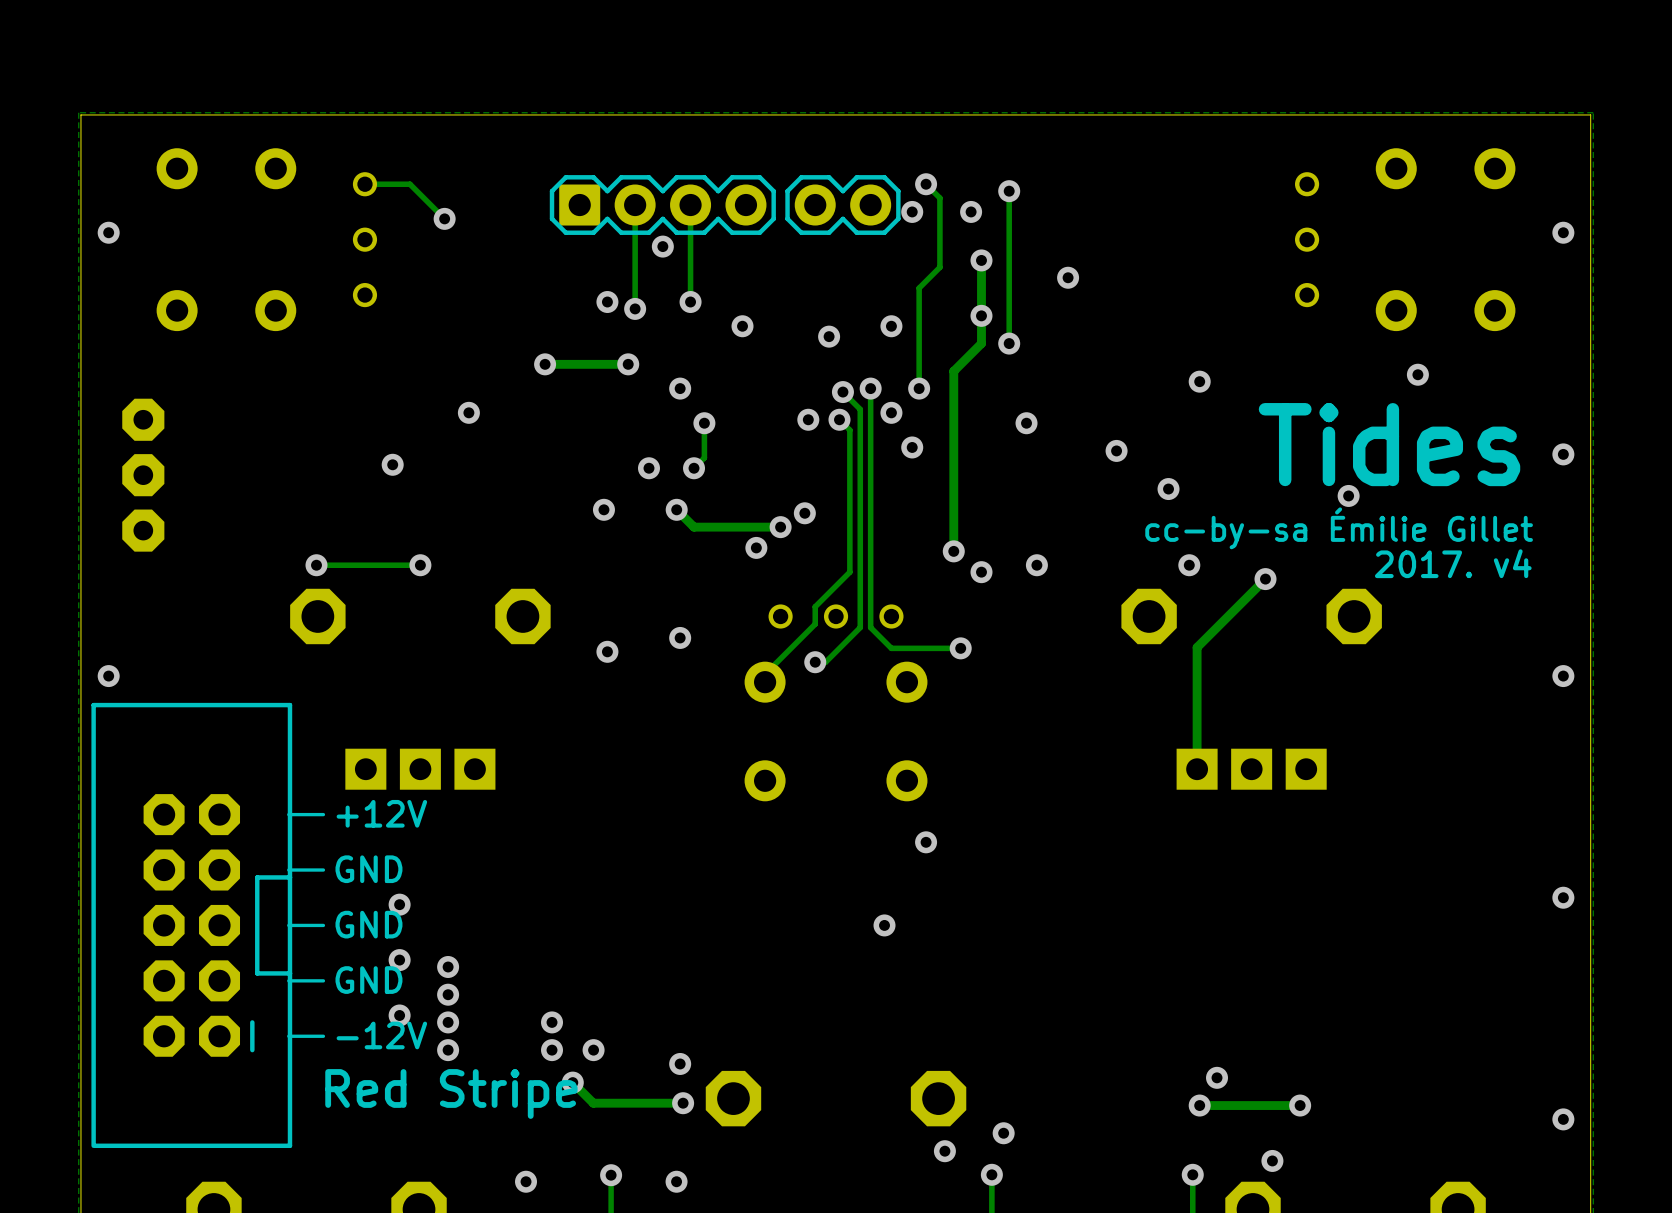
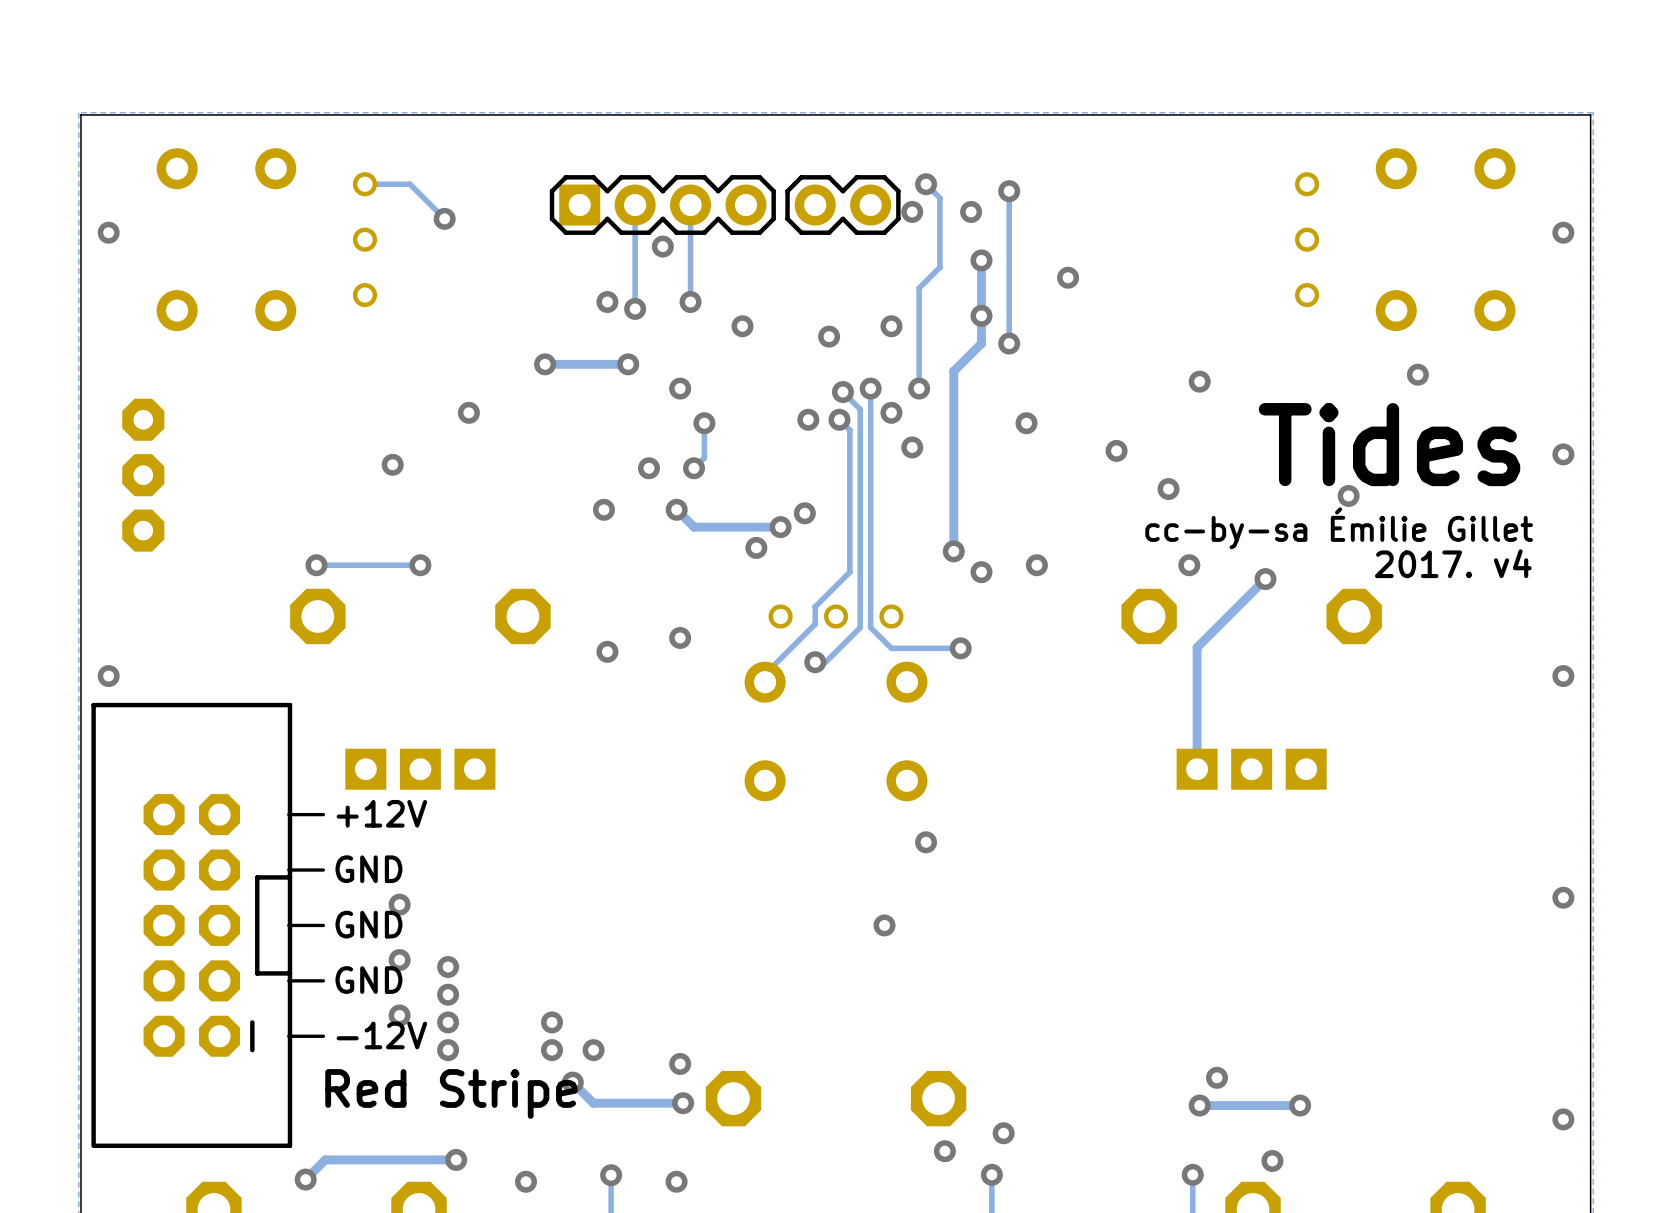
track: none -> (456, 1159) (325, 1159) (305, 1179)
via: none -> (456, 1159)
via: none -> (305, 1179)

